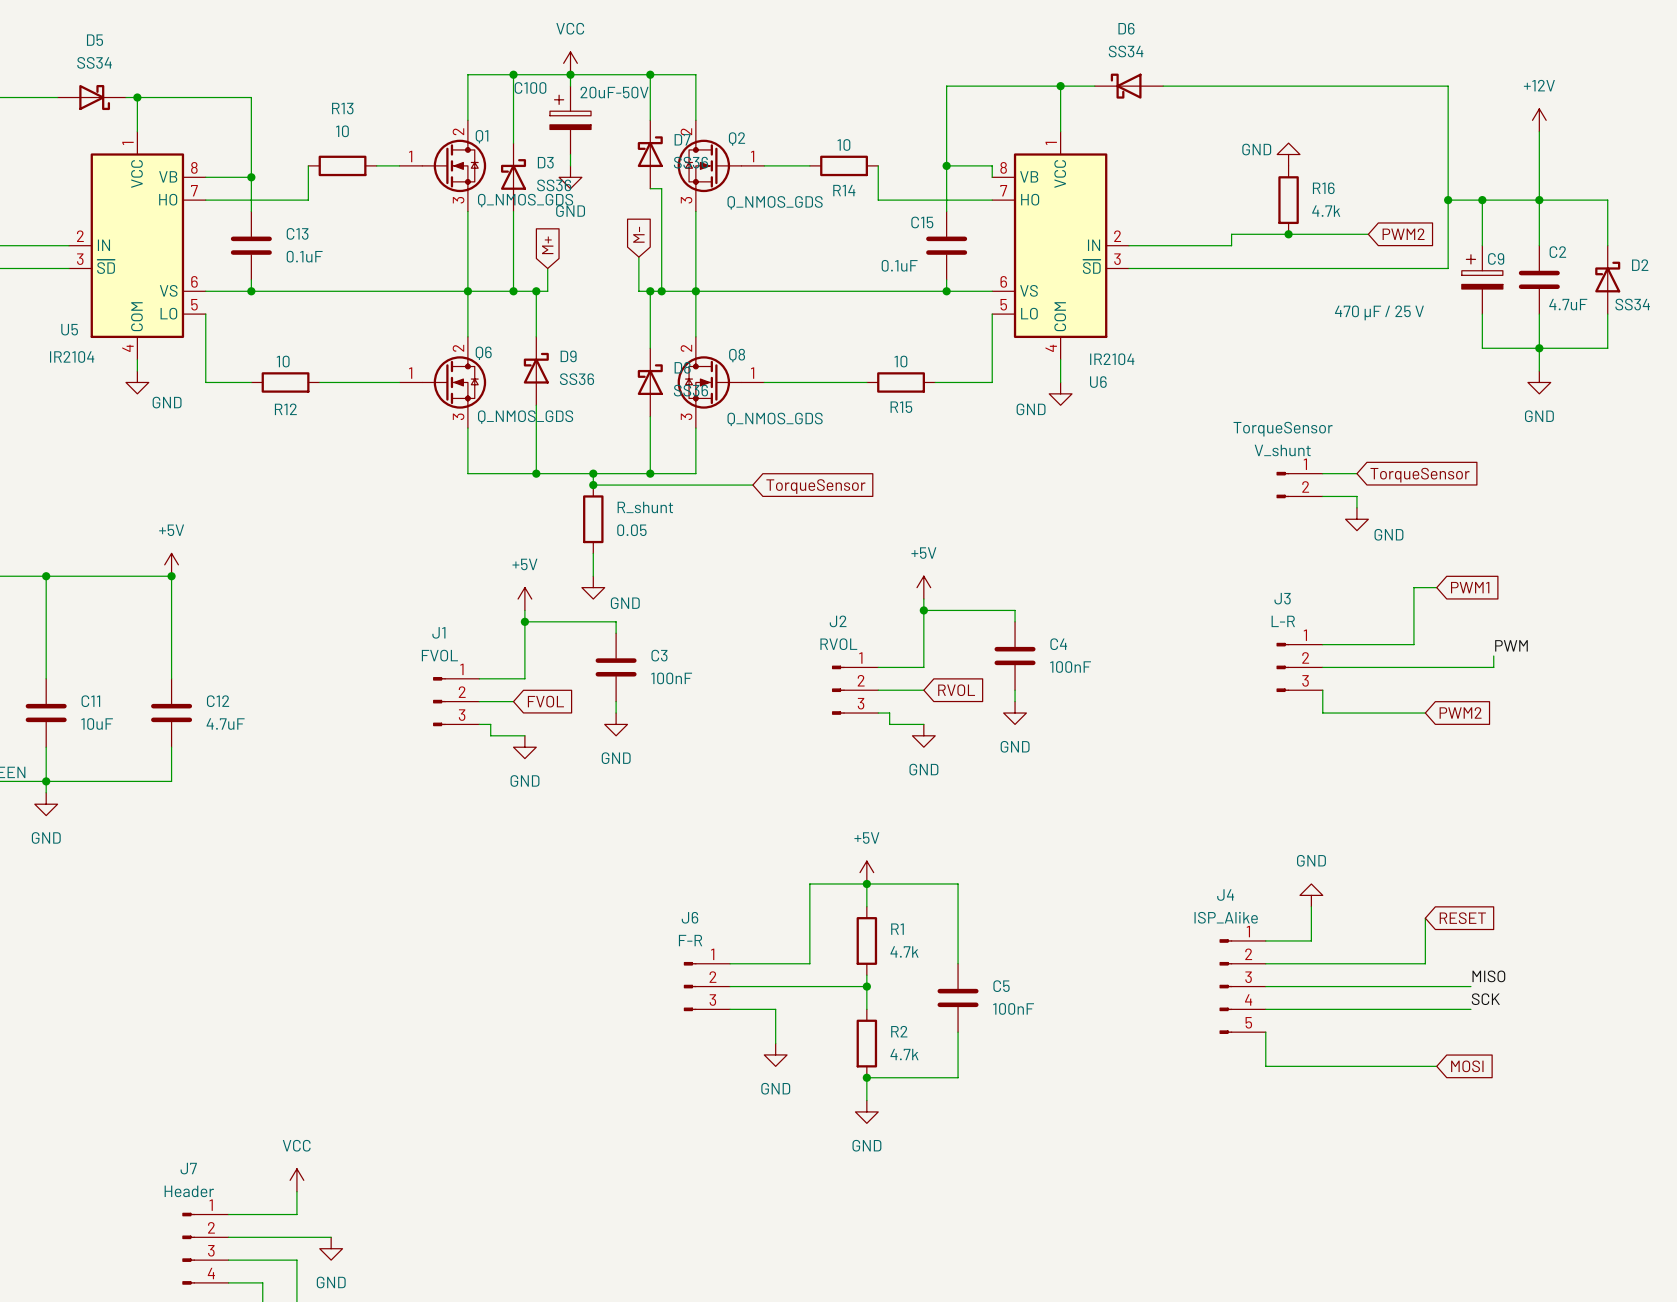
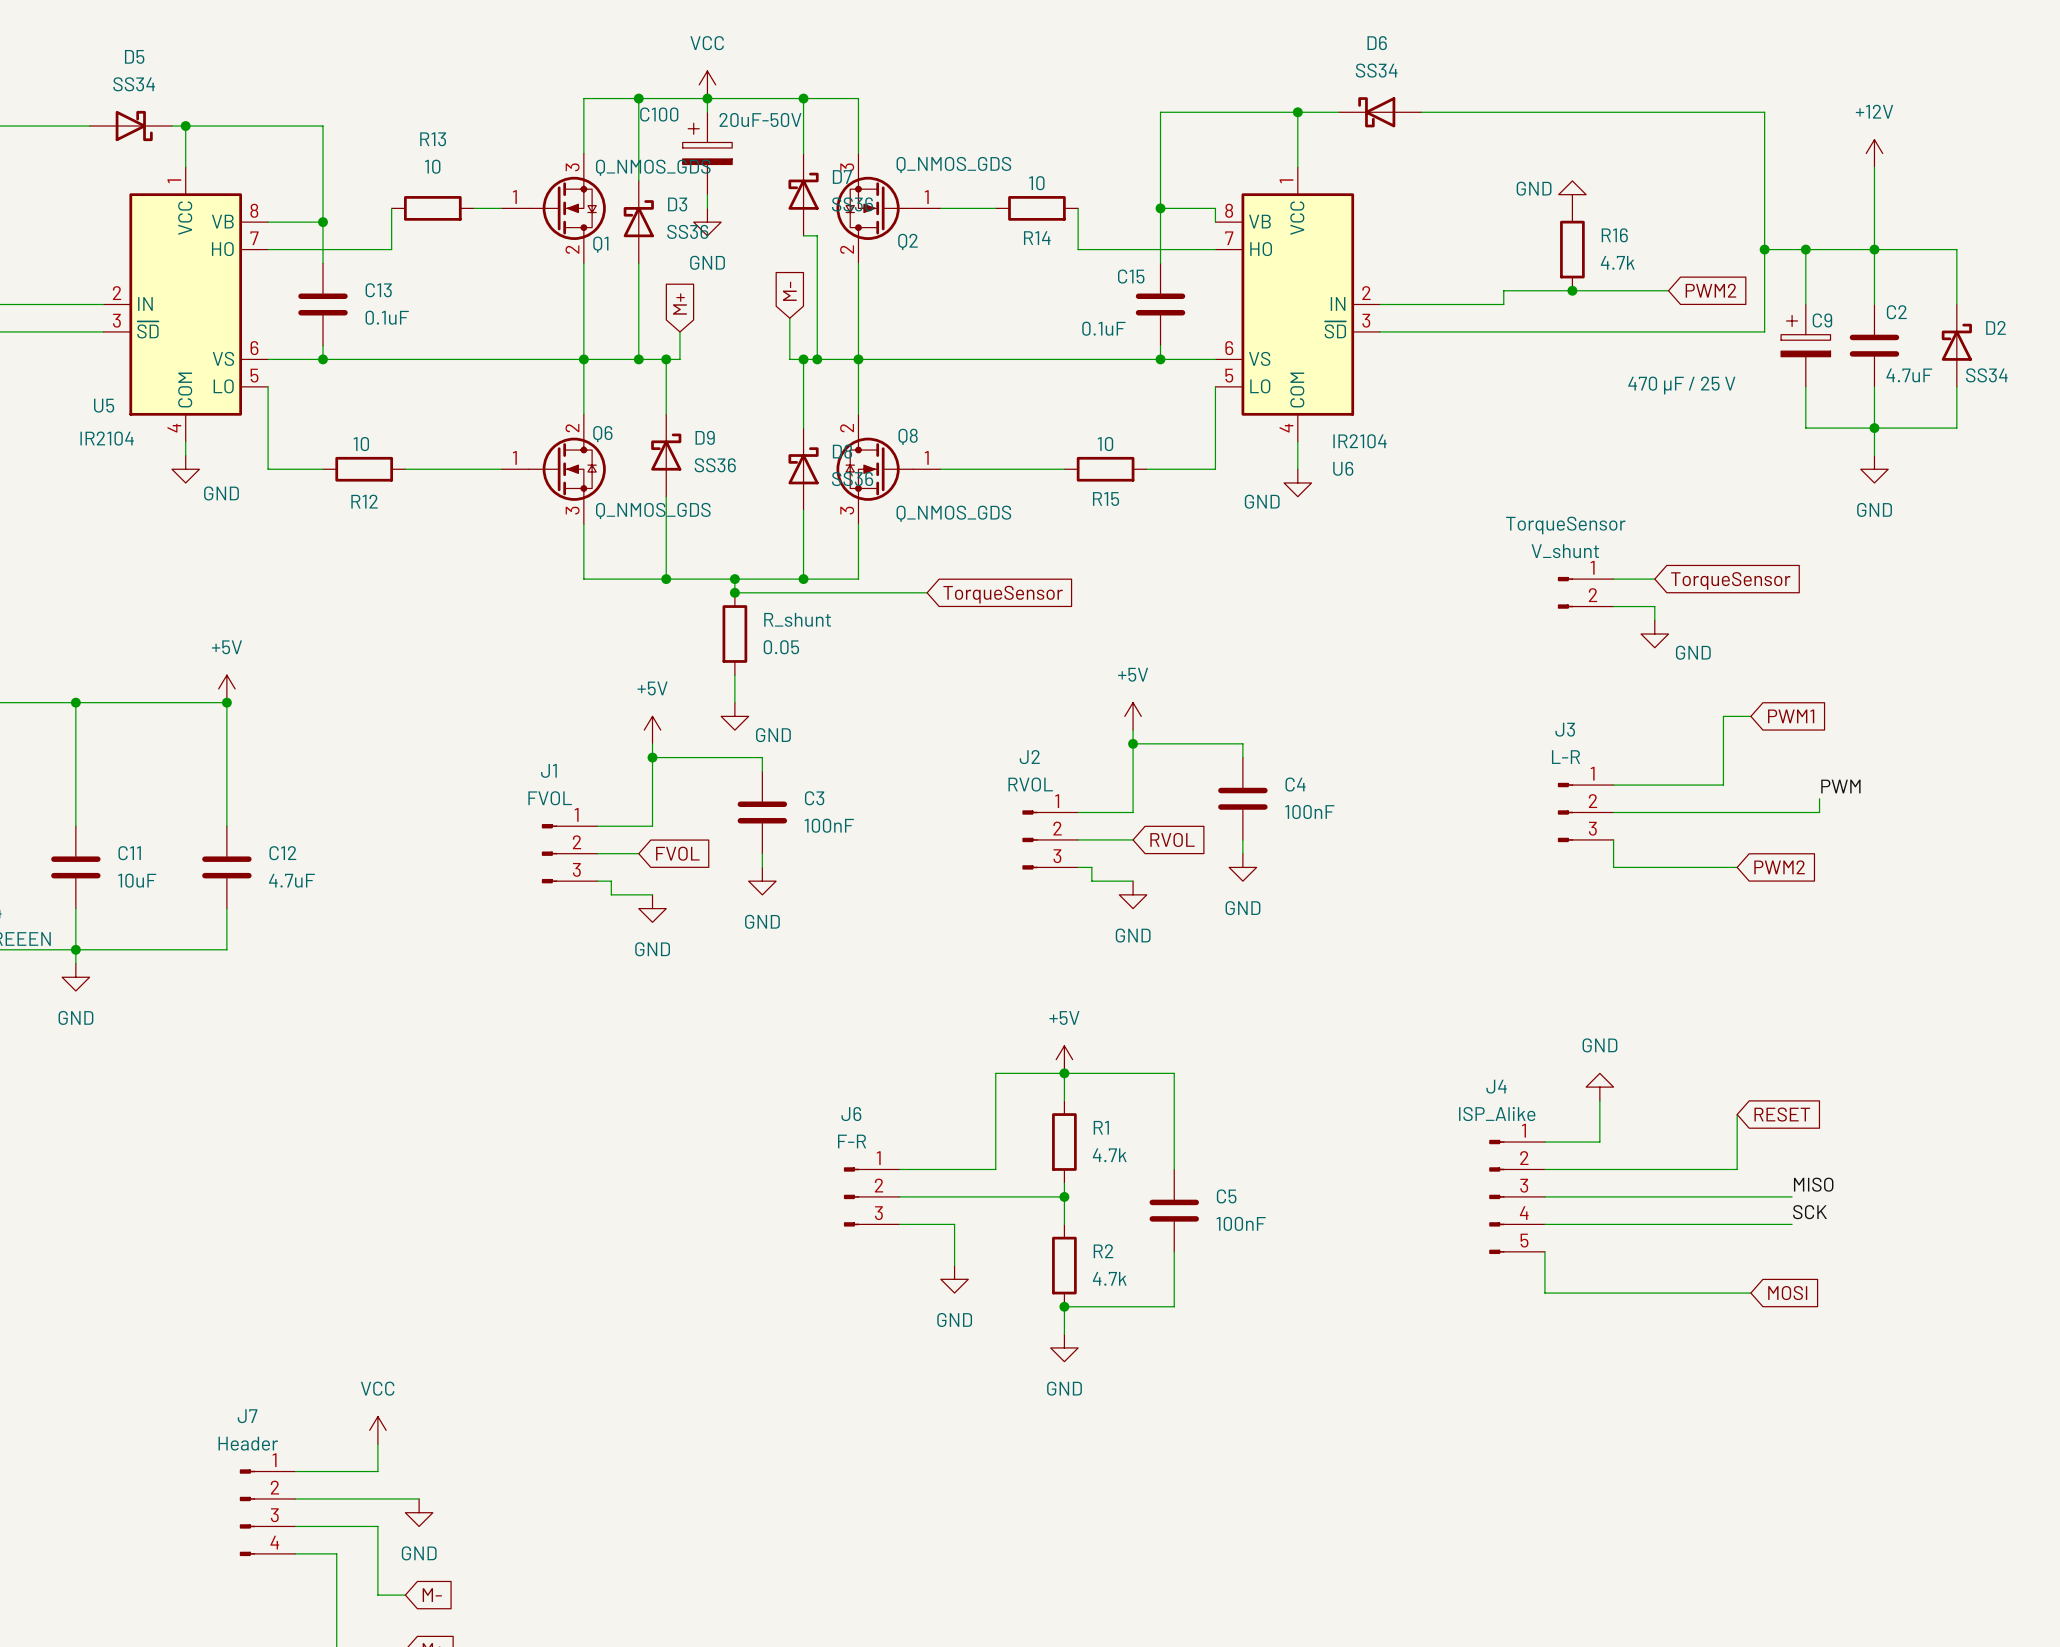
Q1 flip: as is (454, 165) -> up-down (567, 208)
Q2 flip: as is (709, 165) -> up-down (874, 208)

